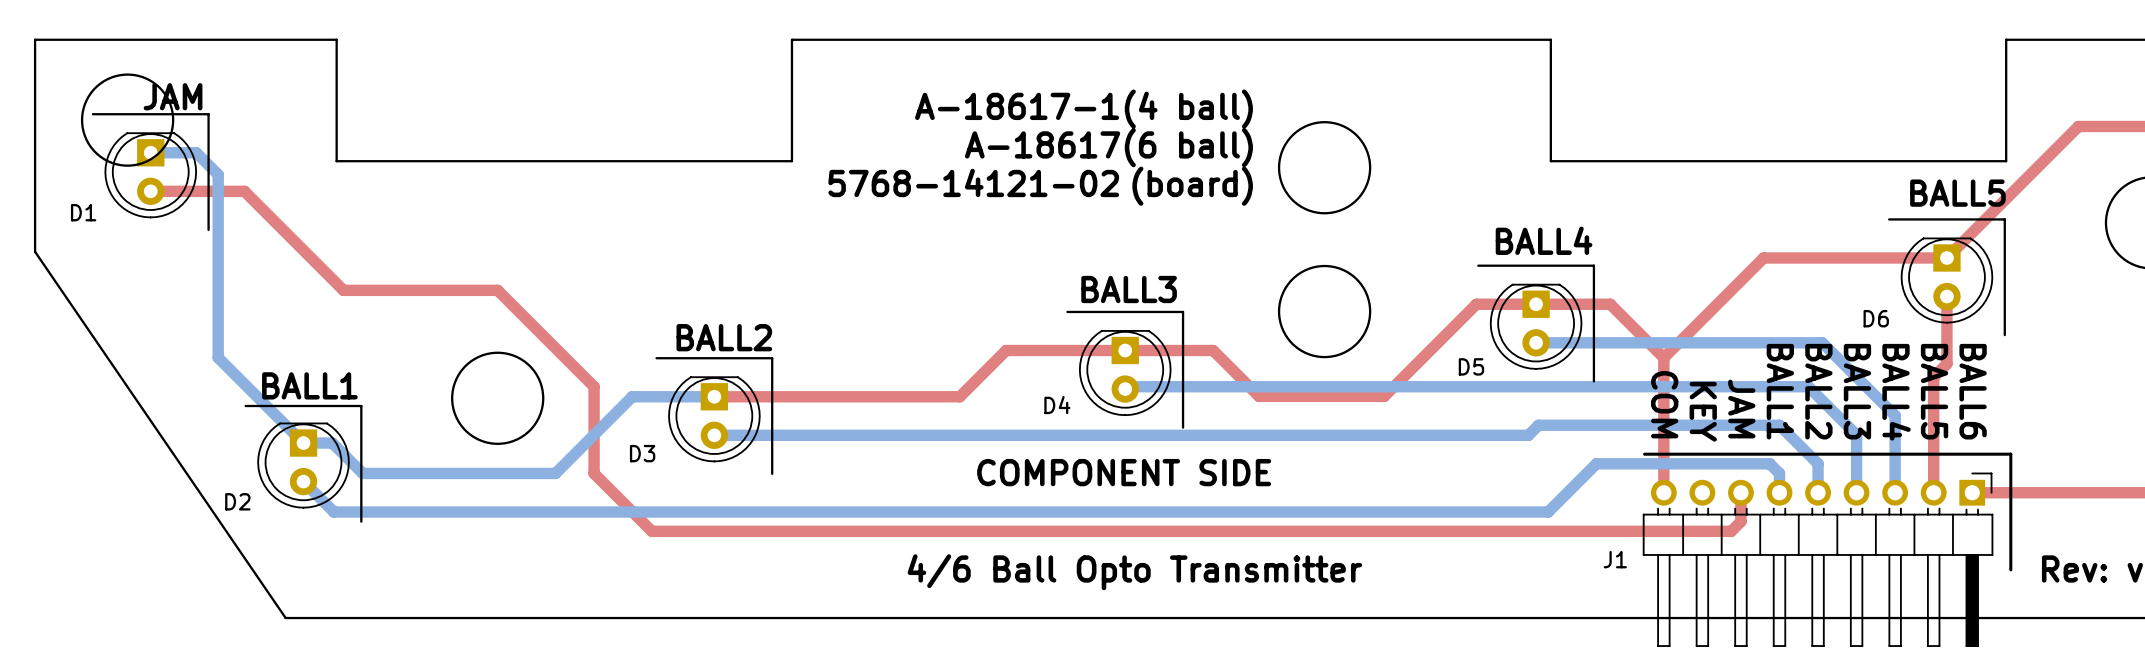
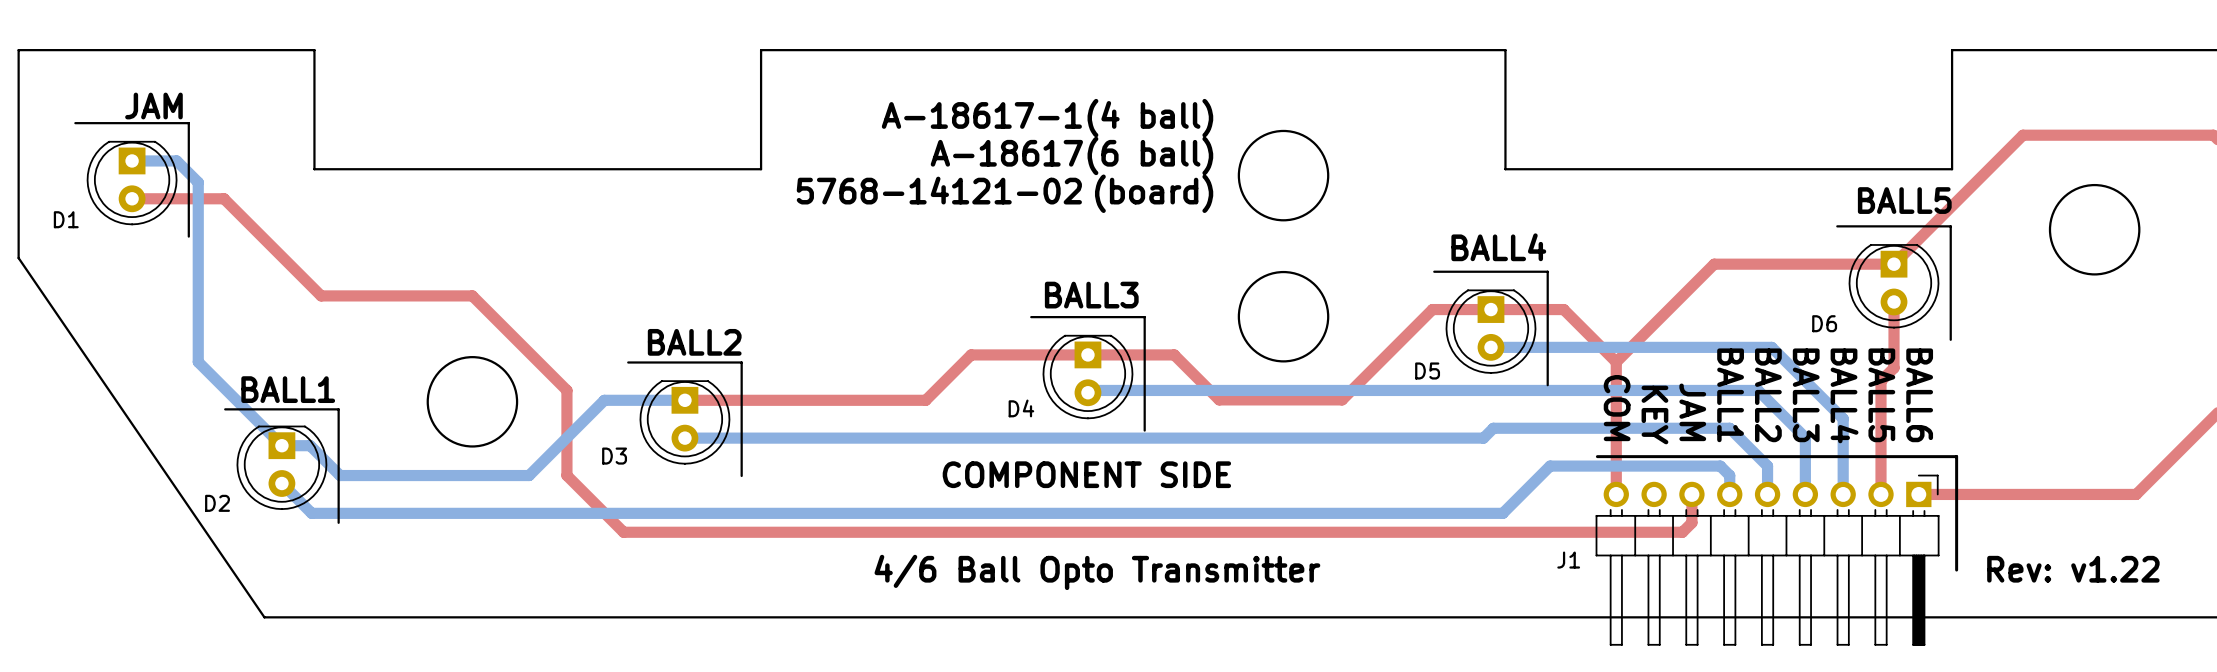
round board edge: [80, 73, 175, 167] -> none

